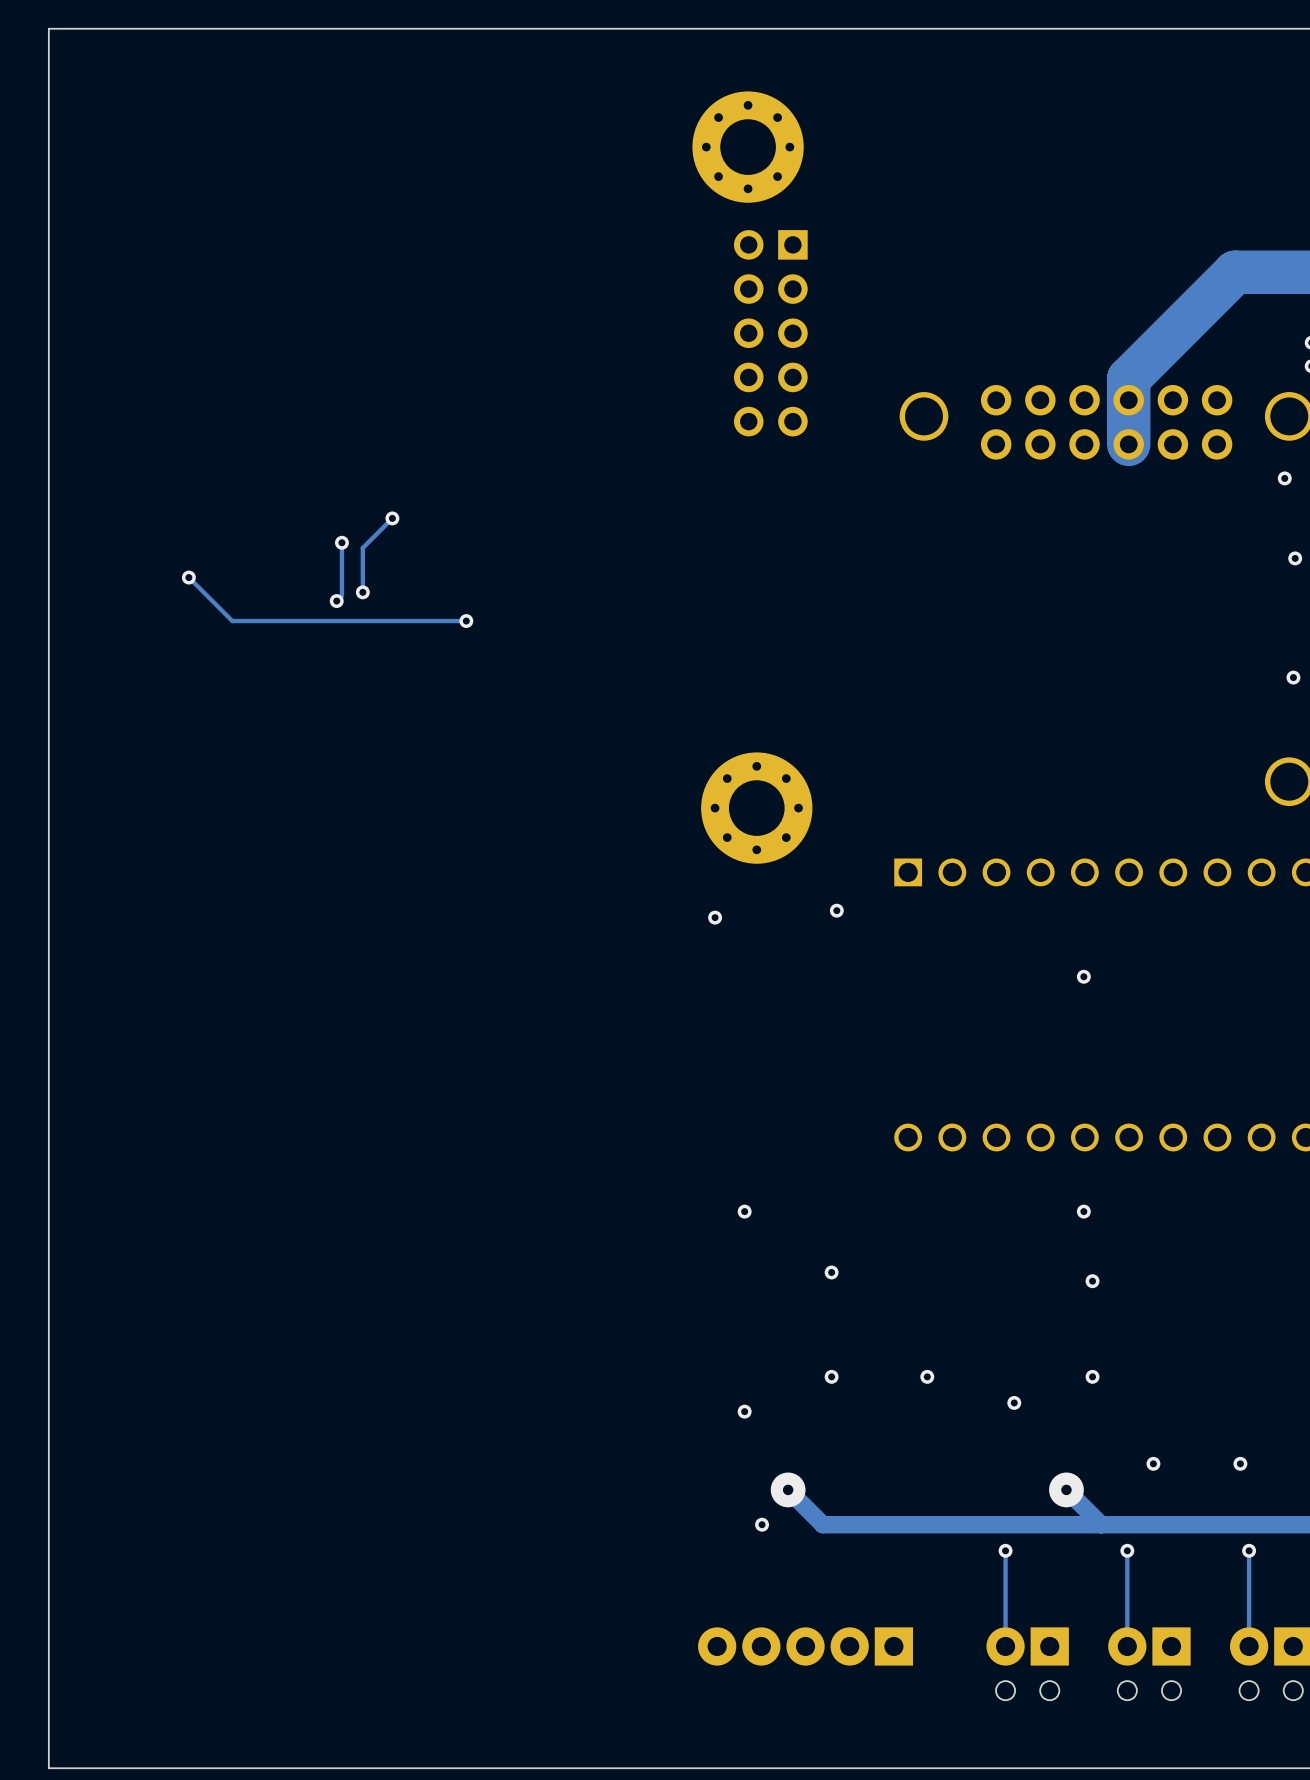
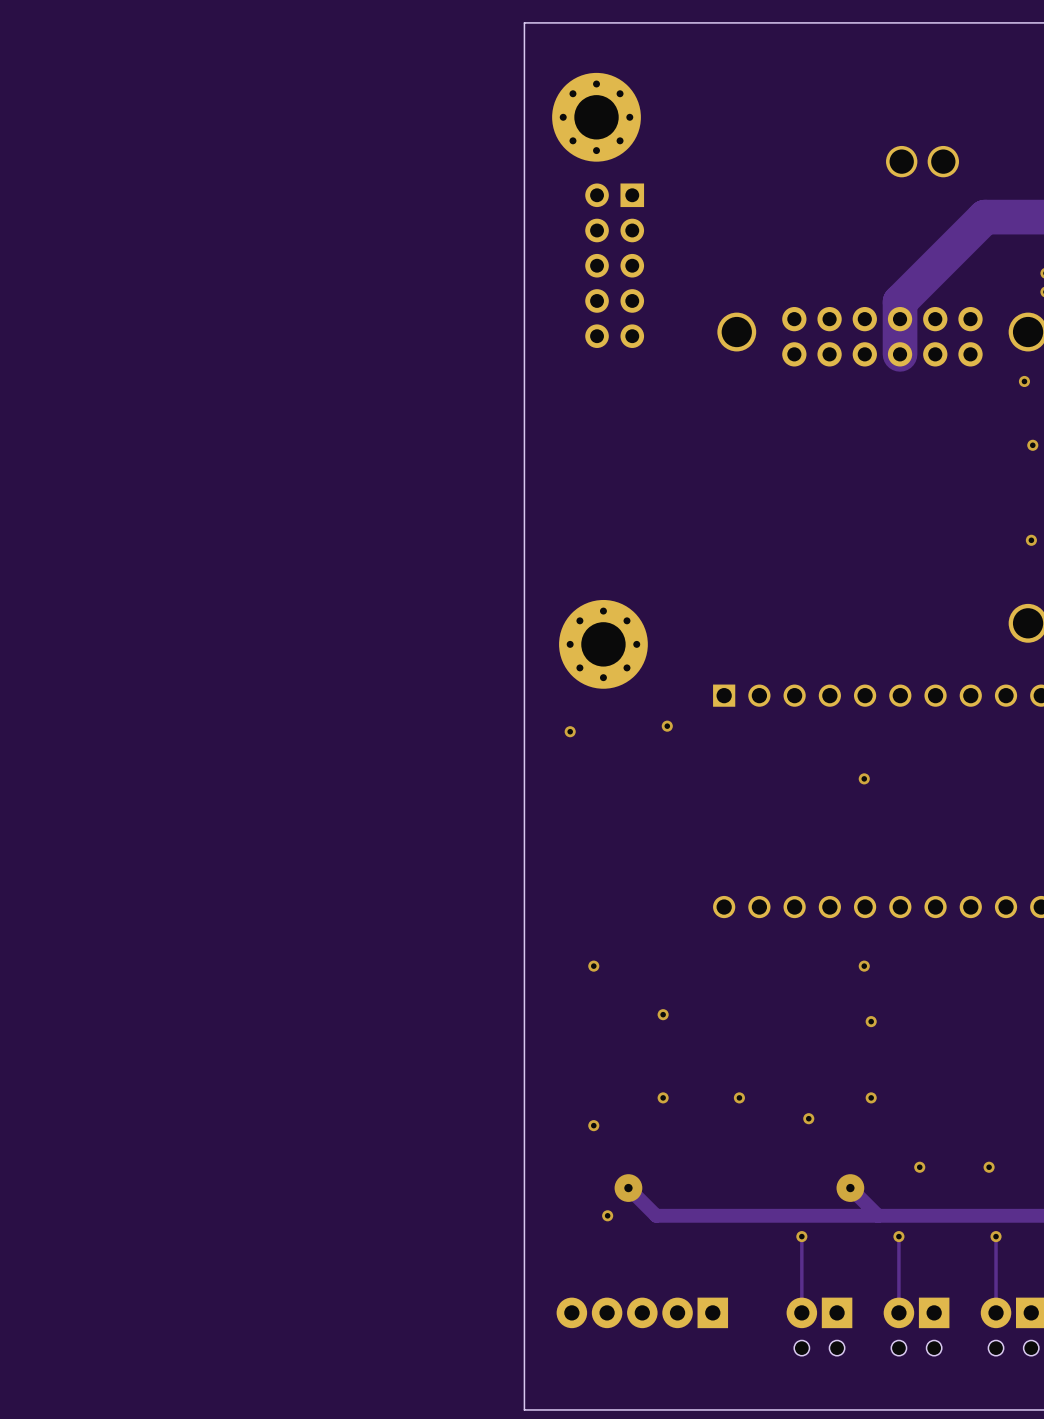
board edge: (657, 28) (48, 28) (48, 1768) (657, 1768) -> (524, 22) (524, 1409)
part: none -> (901, 161)
part: none -> (943, 161)
track: (392, 518) (362, 547) (362, 592) -> none
via: (392, 518) -> none
track: (341, 542) (341, 595) (336, 601) -> none
via: (341, 542) -> none
track: (188, 577) (232, 621) (466, 621) -> none
via: (188, 577) -> none
via: (362, 592) -> none
via: (336, 601) -> none
via: (466, 621) -> none

